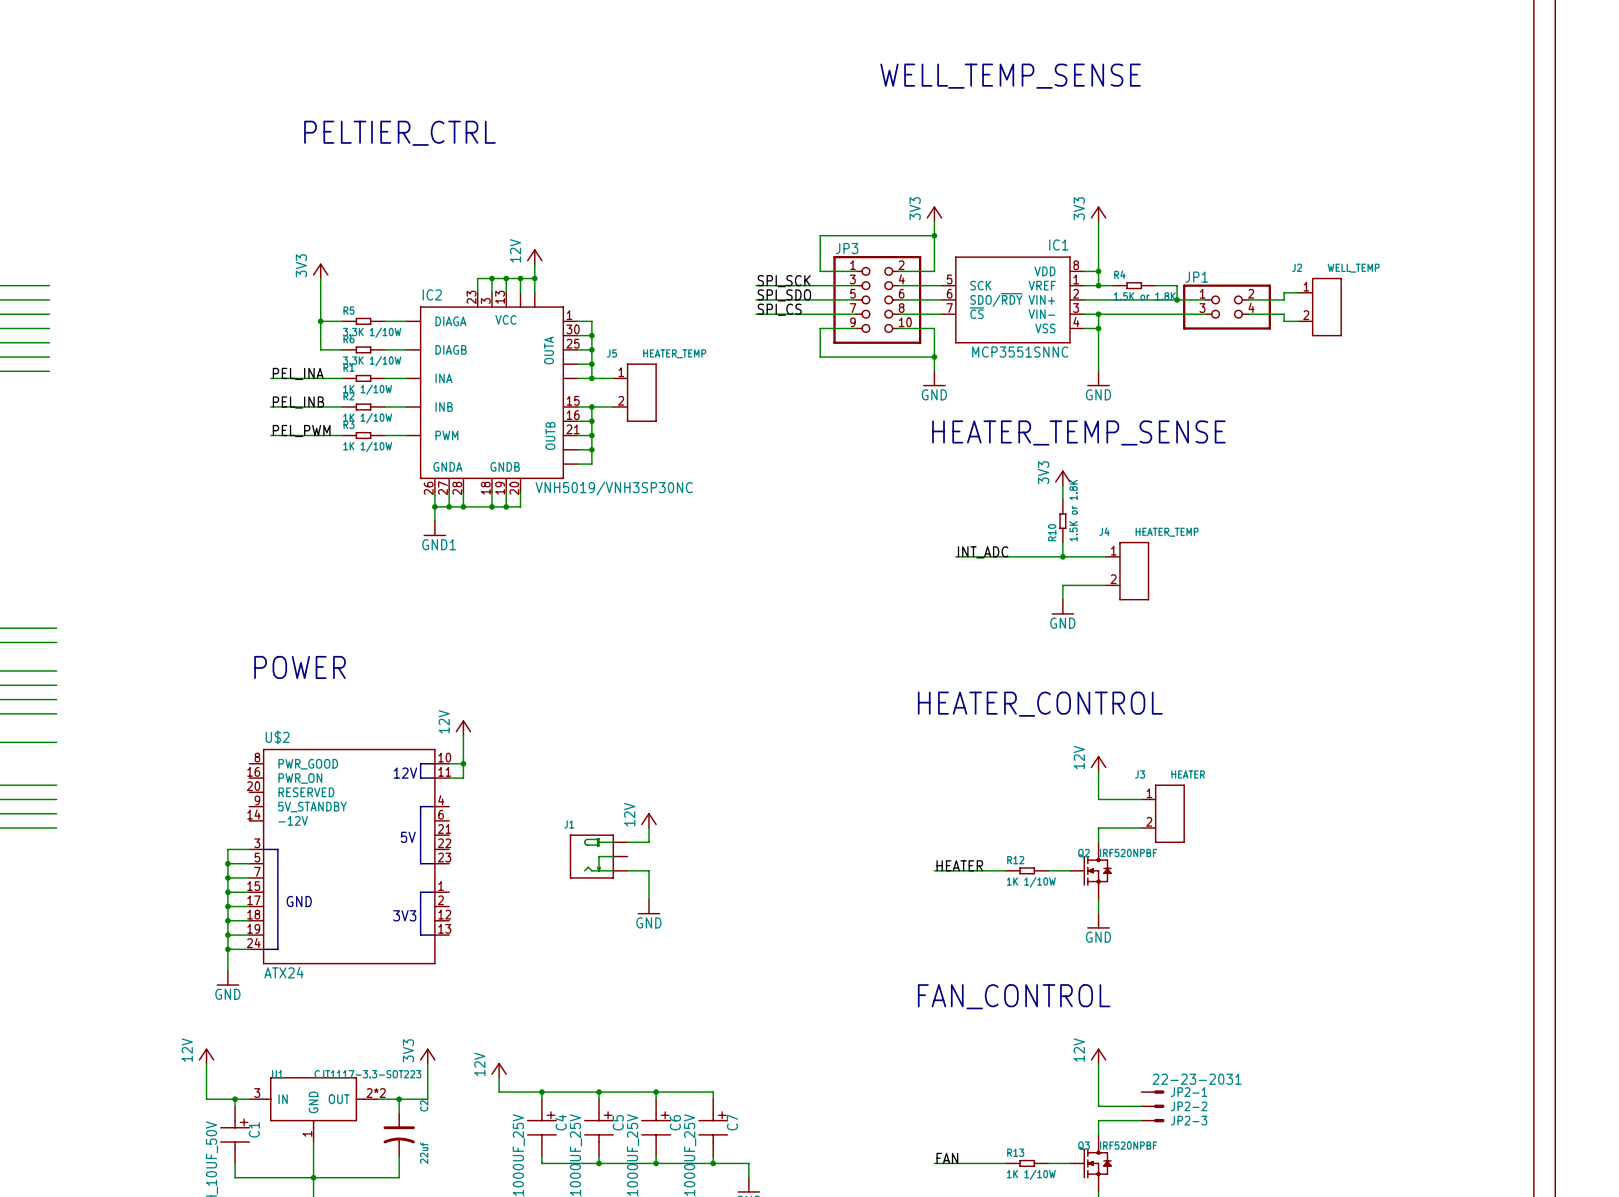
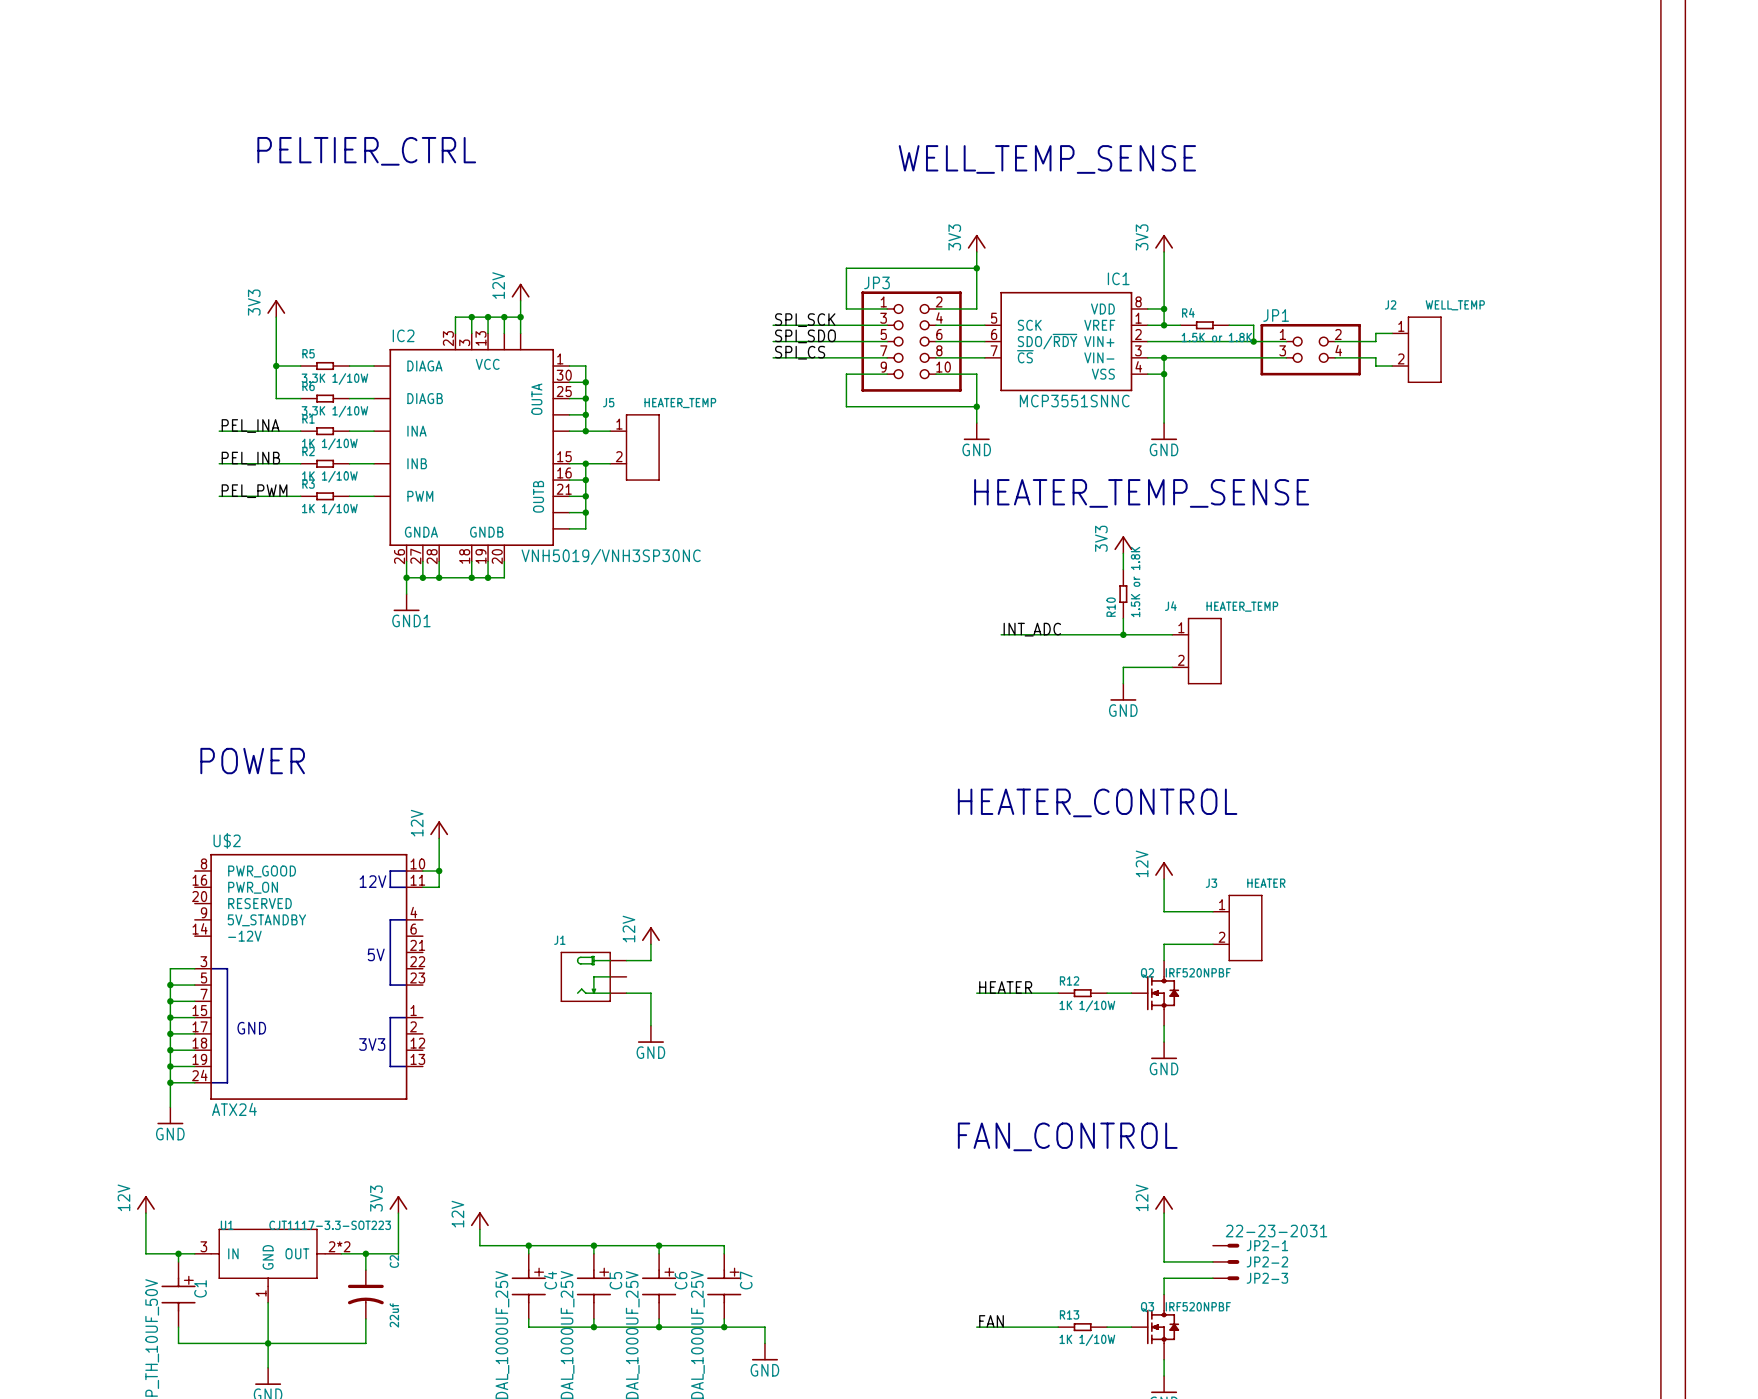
text position: WELL_TEMP_SENSE (1010, 76) -> WELL_TEMP_SENSE (1047, 159)

